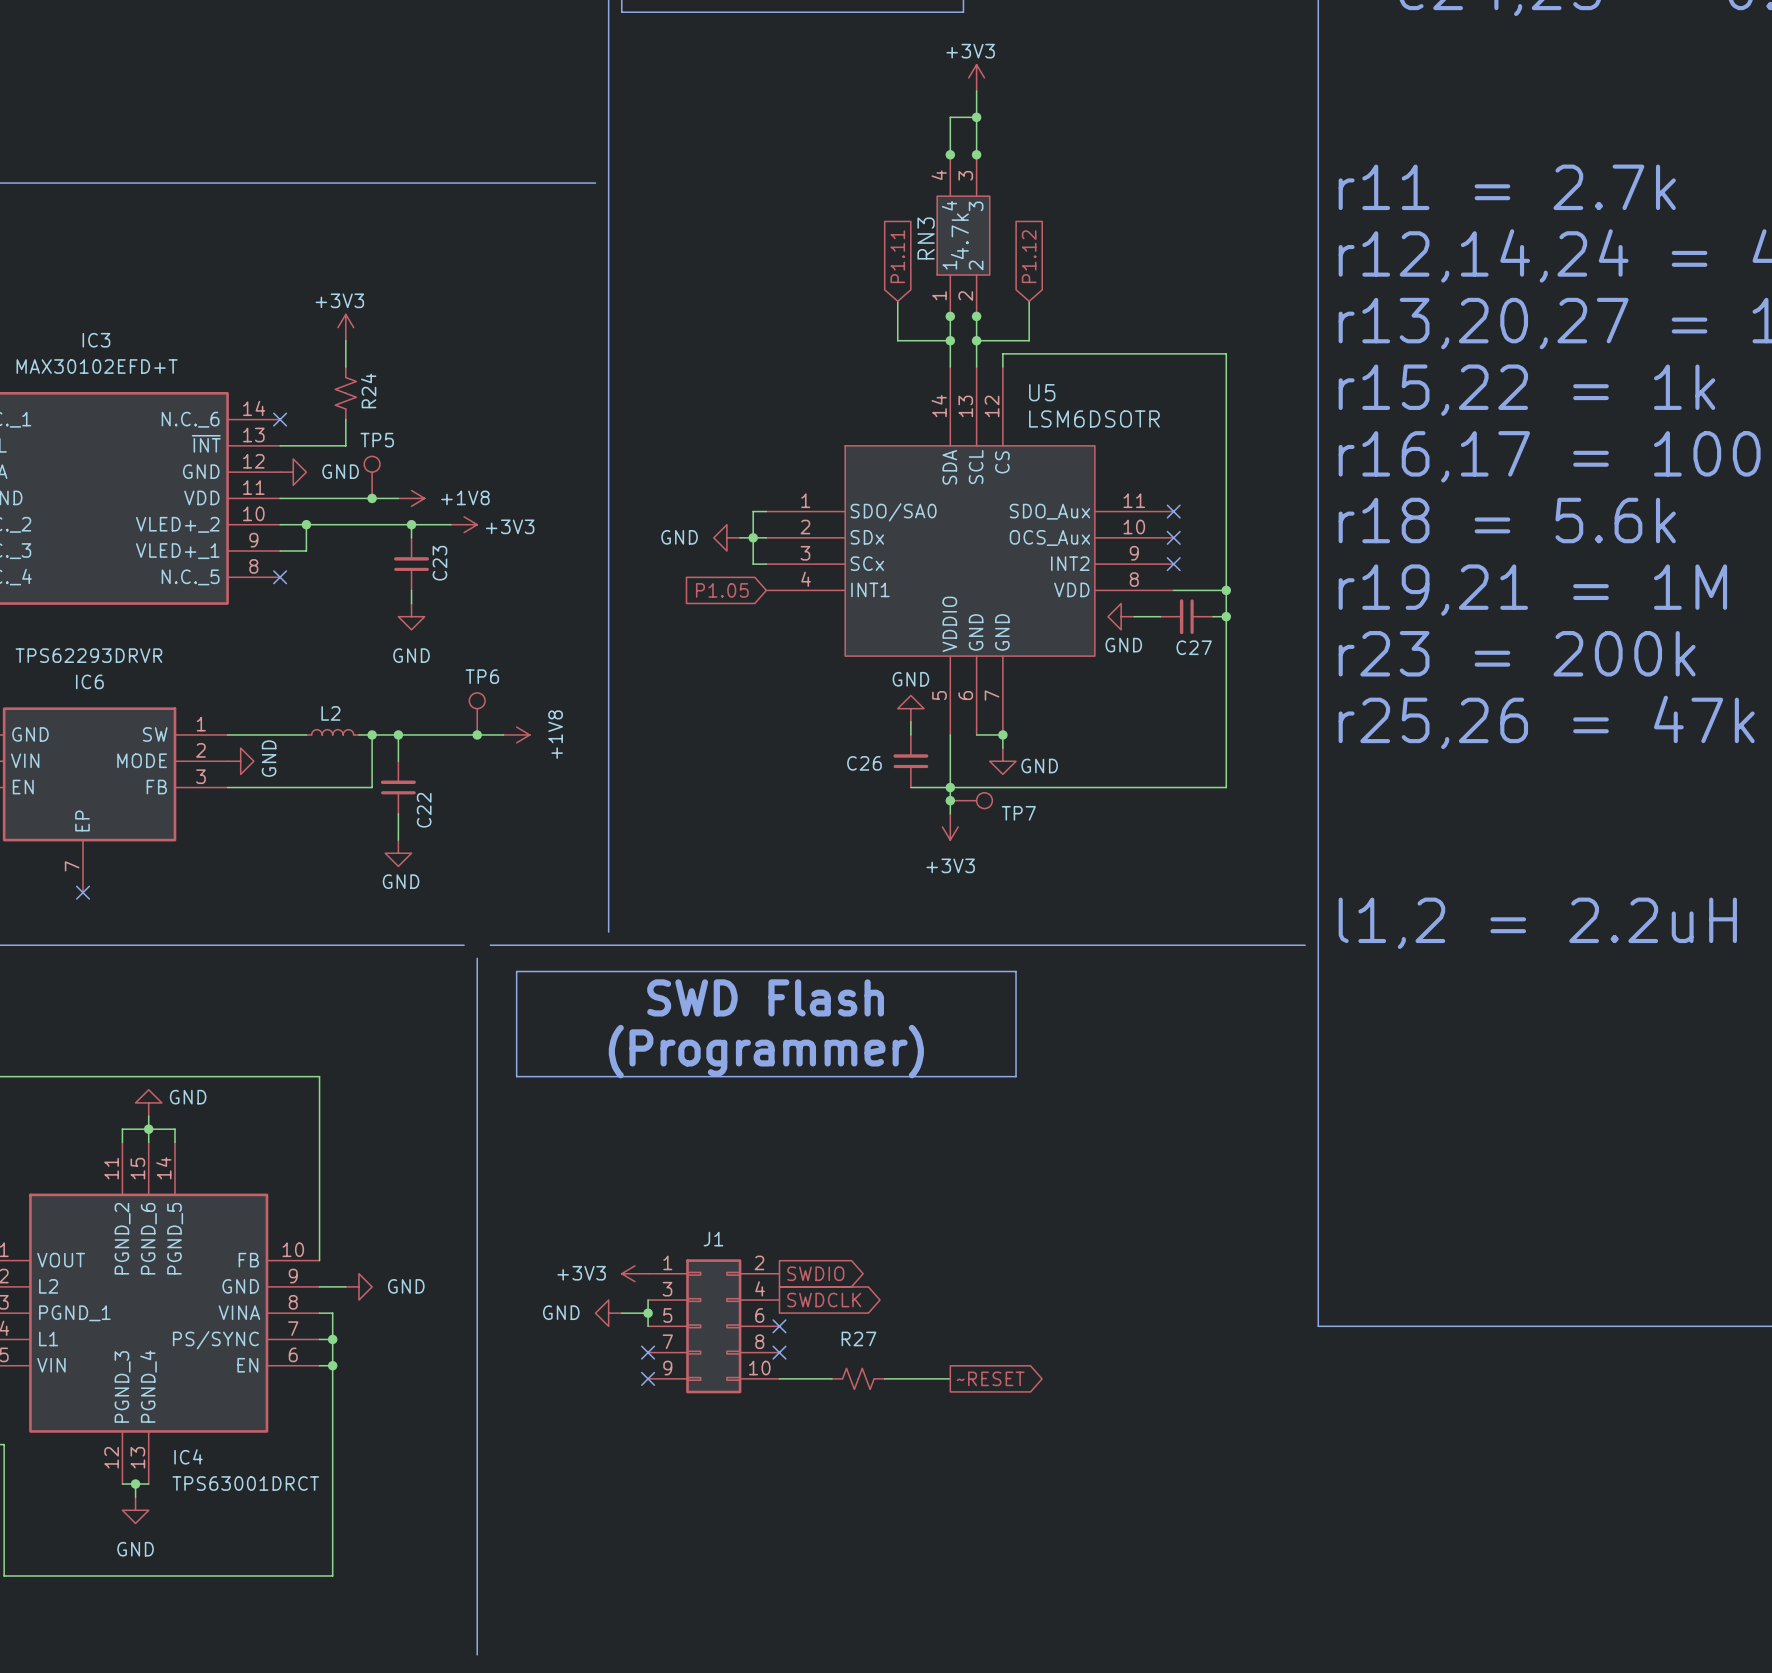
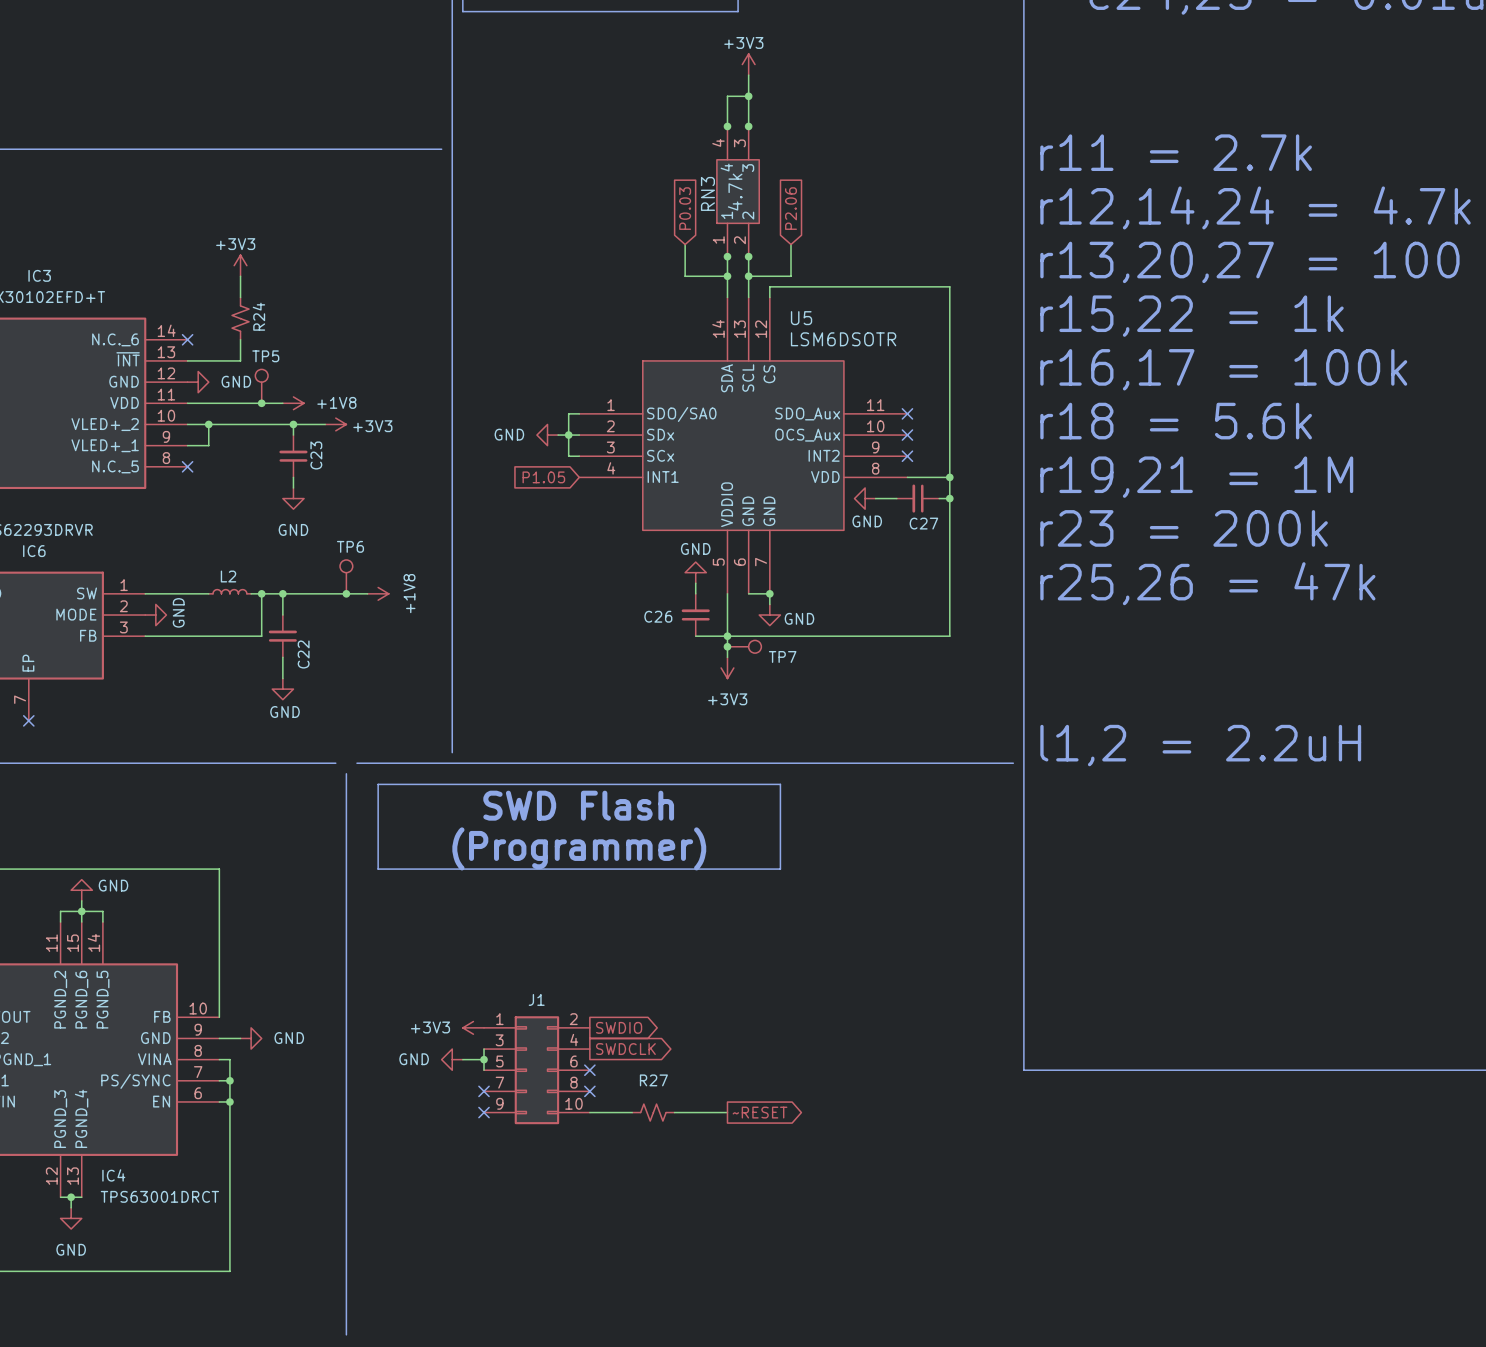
global label: P1.11 (897, 256) -> P0.03 (685, 208)
global label: P1.12 (1029, 256) -> P2.06 (791, 208)

